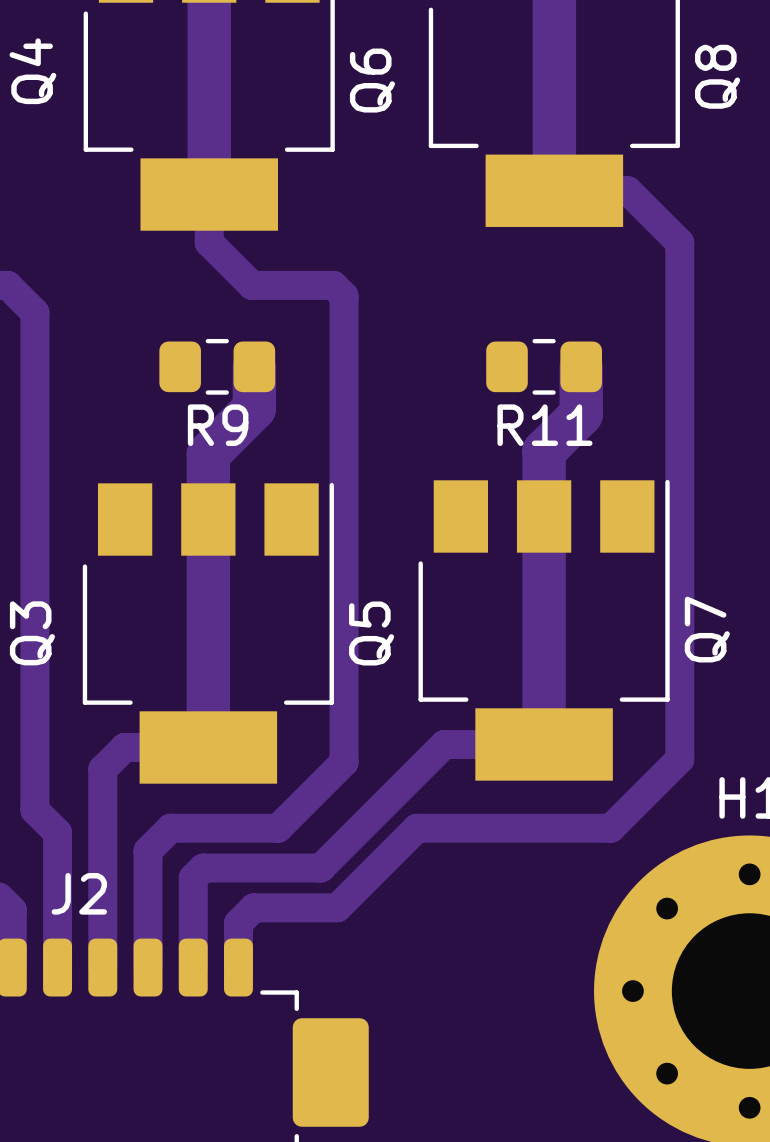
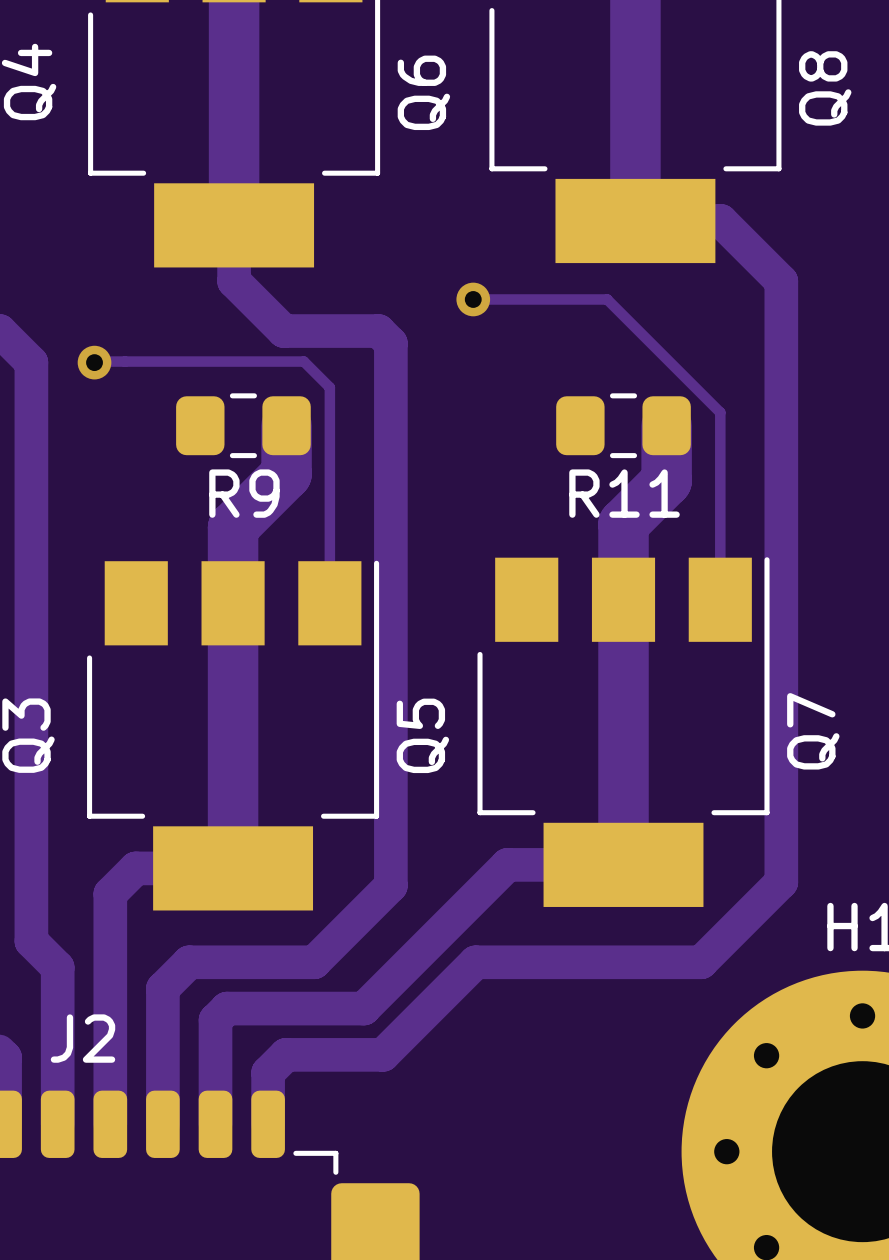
track: none -> (473, 299) (607, 299) (720, 412) (720, 599)
via: none -> (473, 299)
track: none -> (94, 362) (303, 361) (329, 387) (329, 603)
via: none -> (94, 362)

